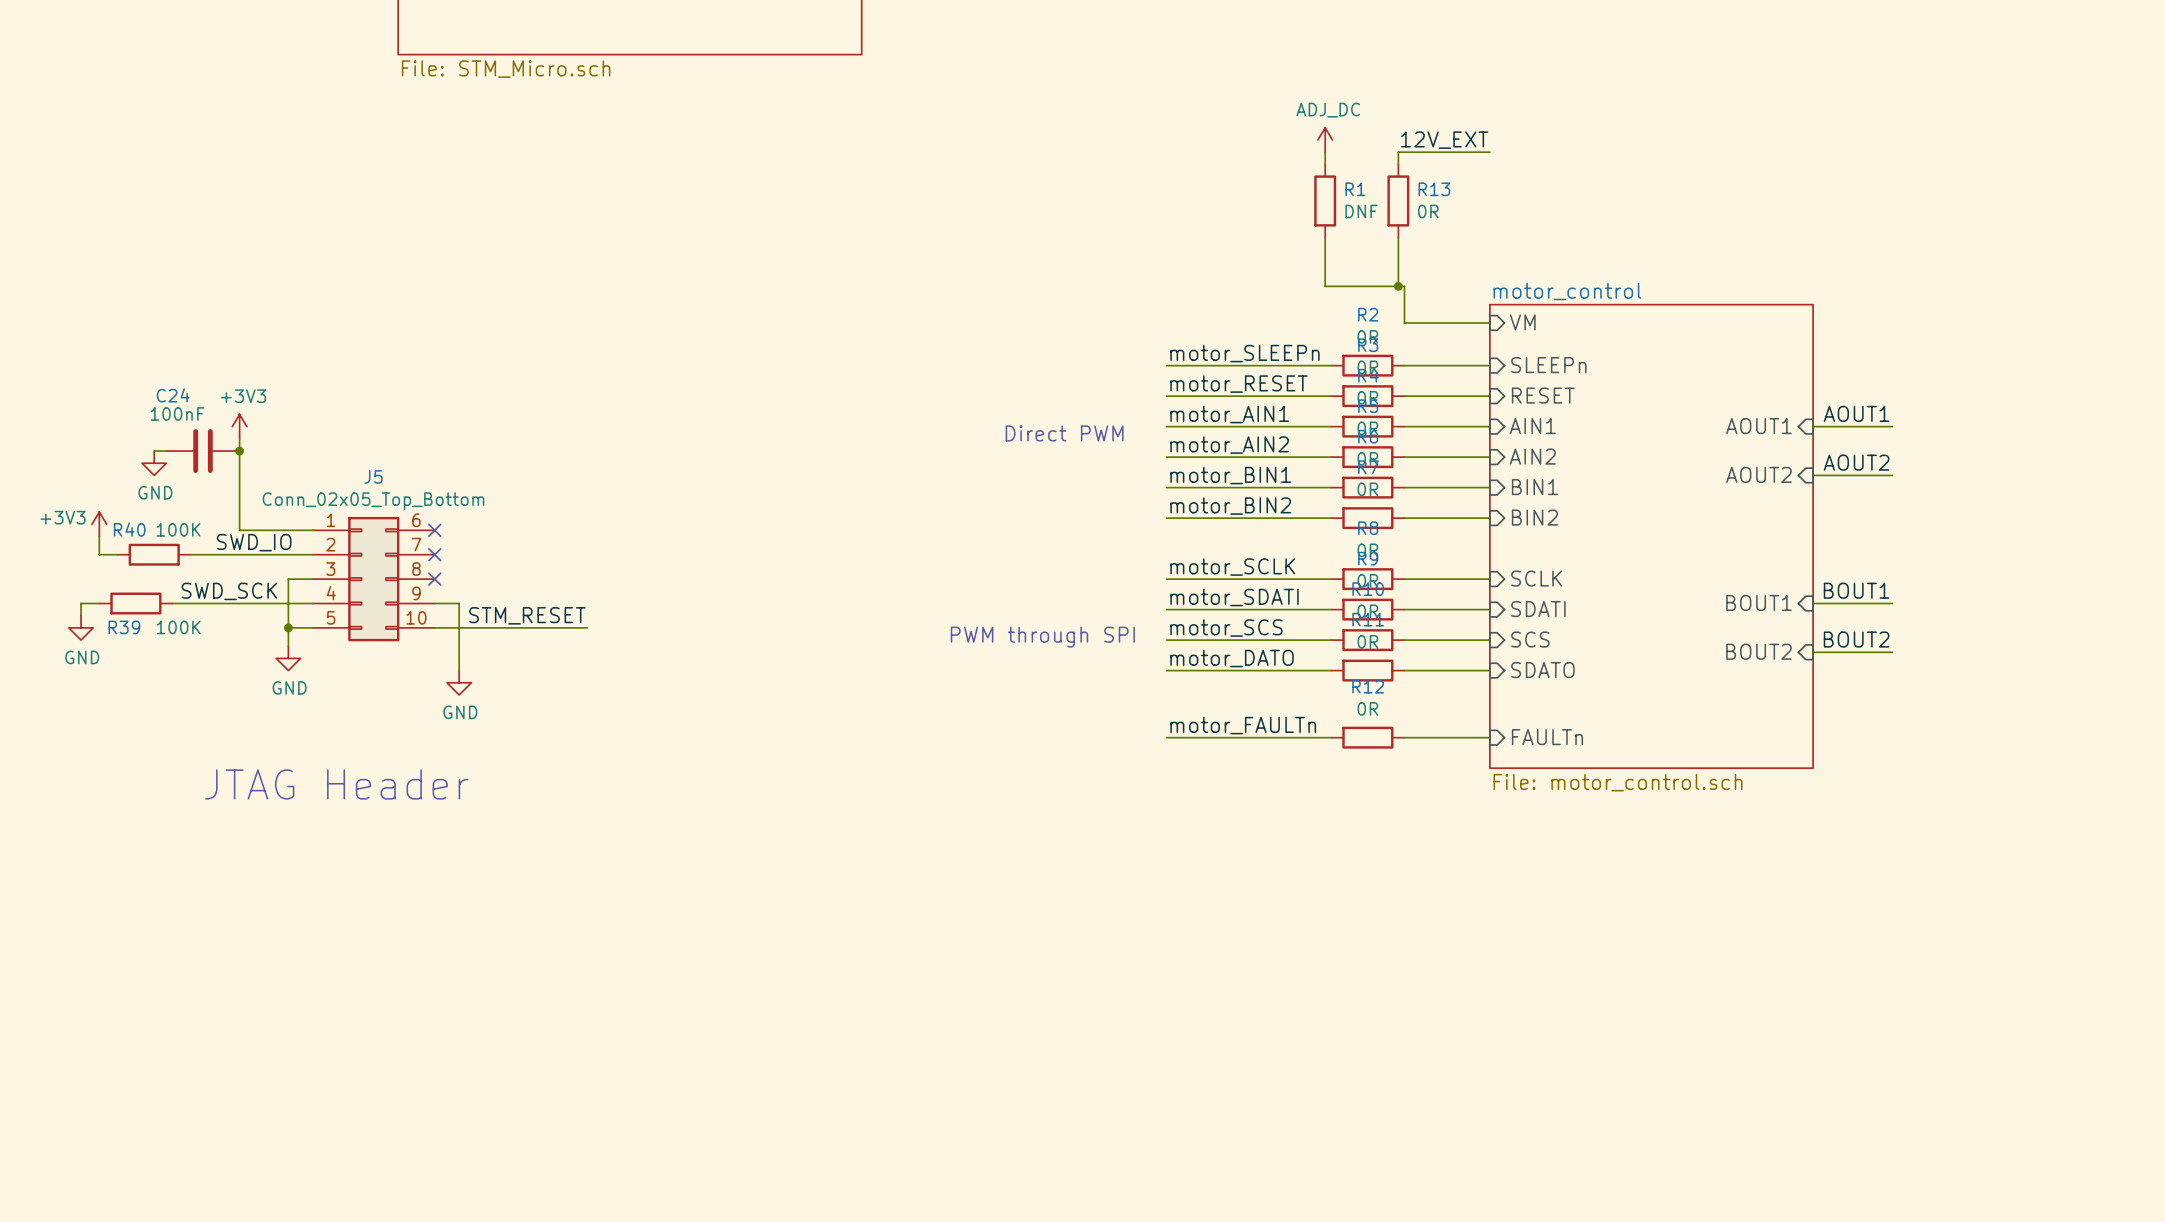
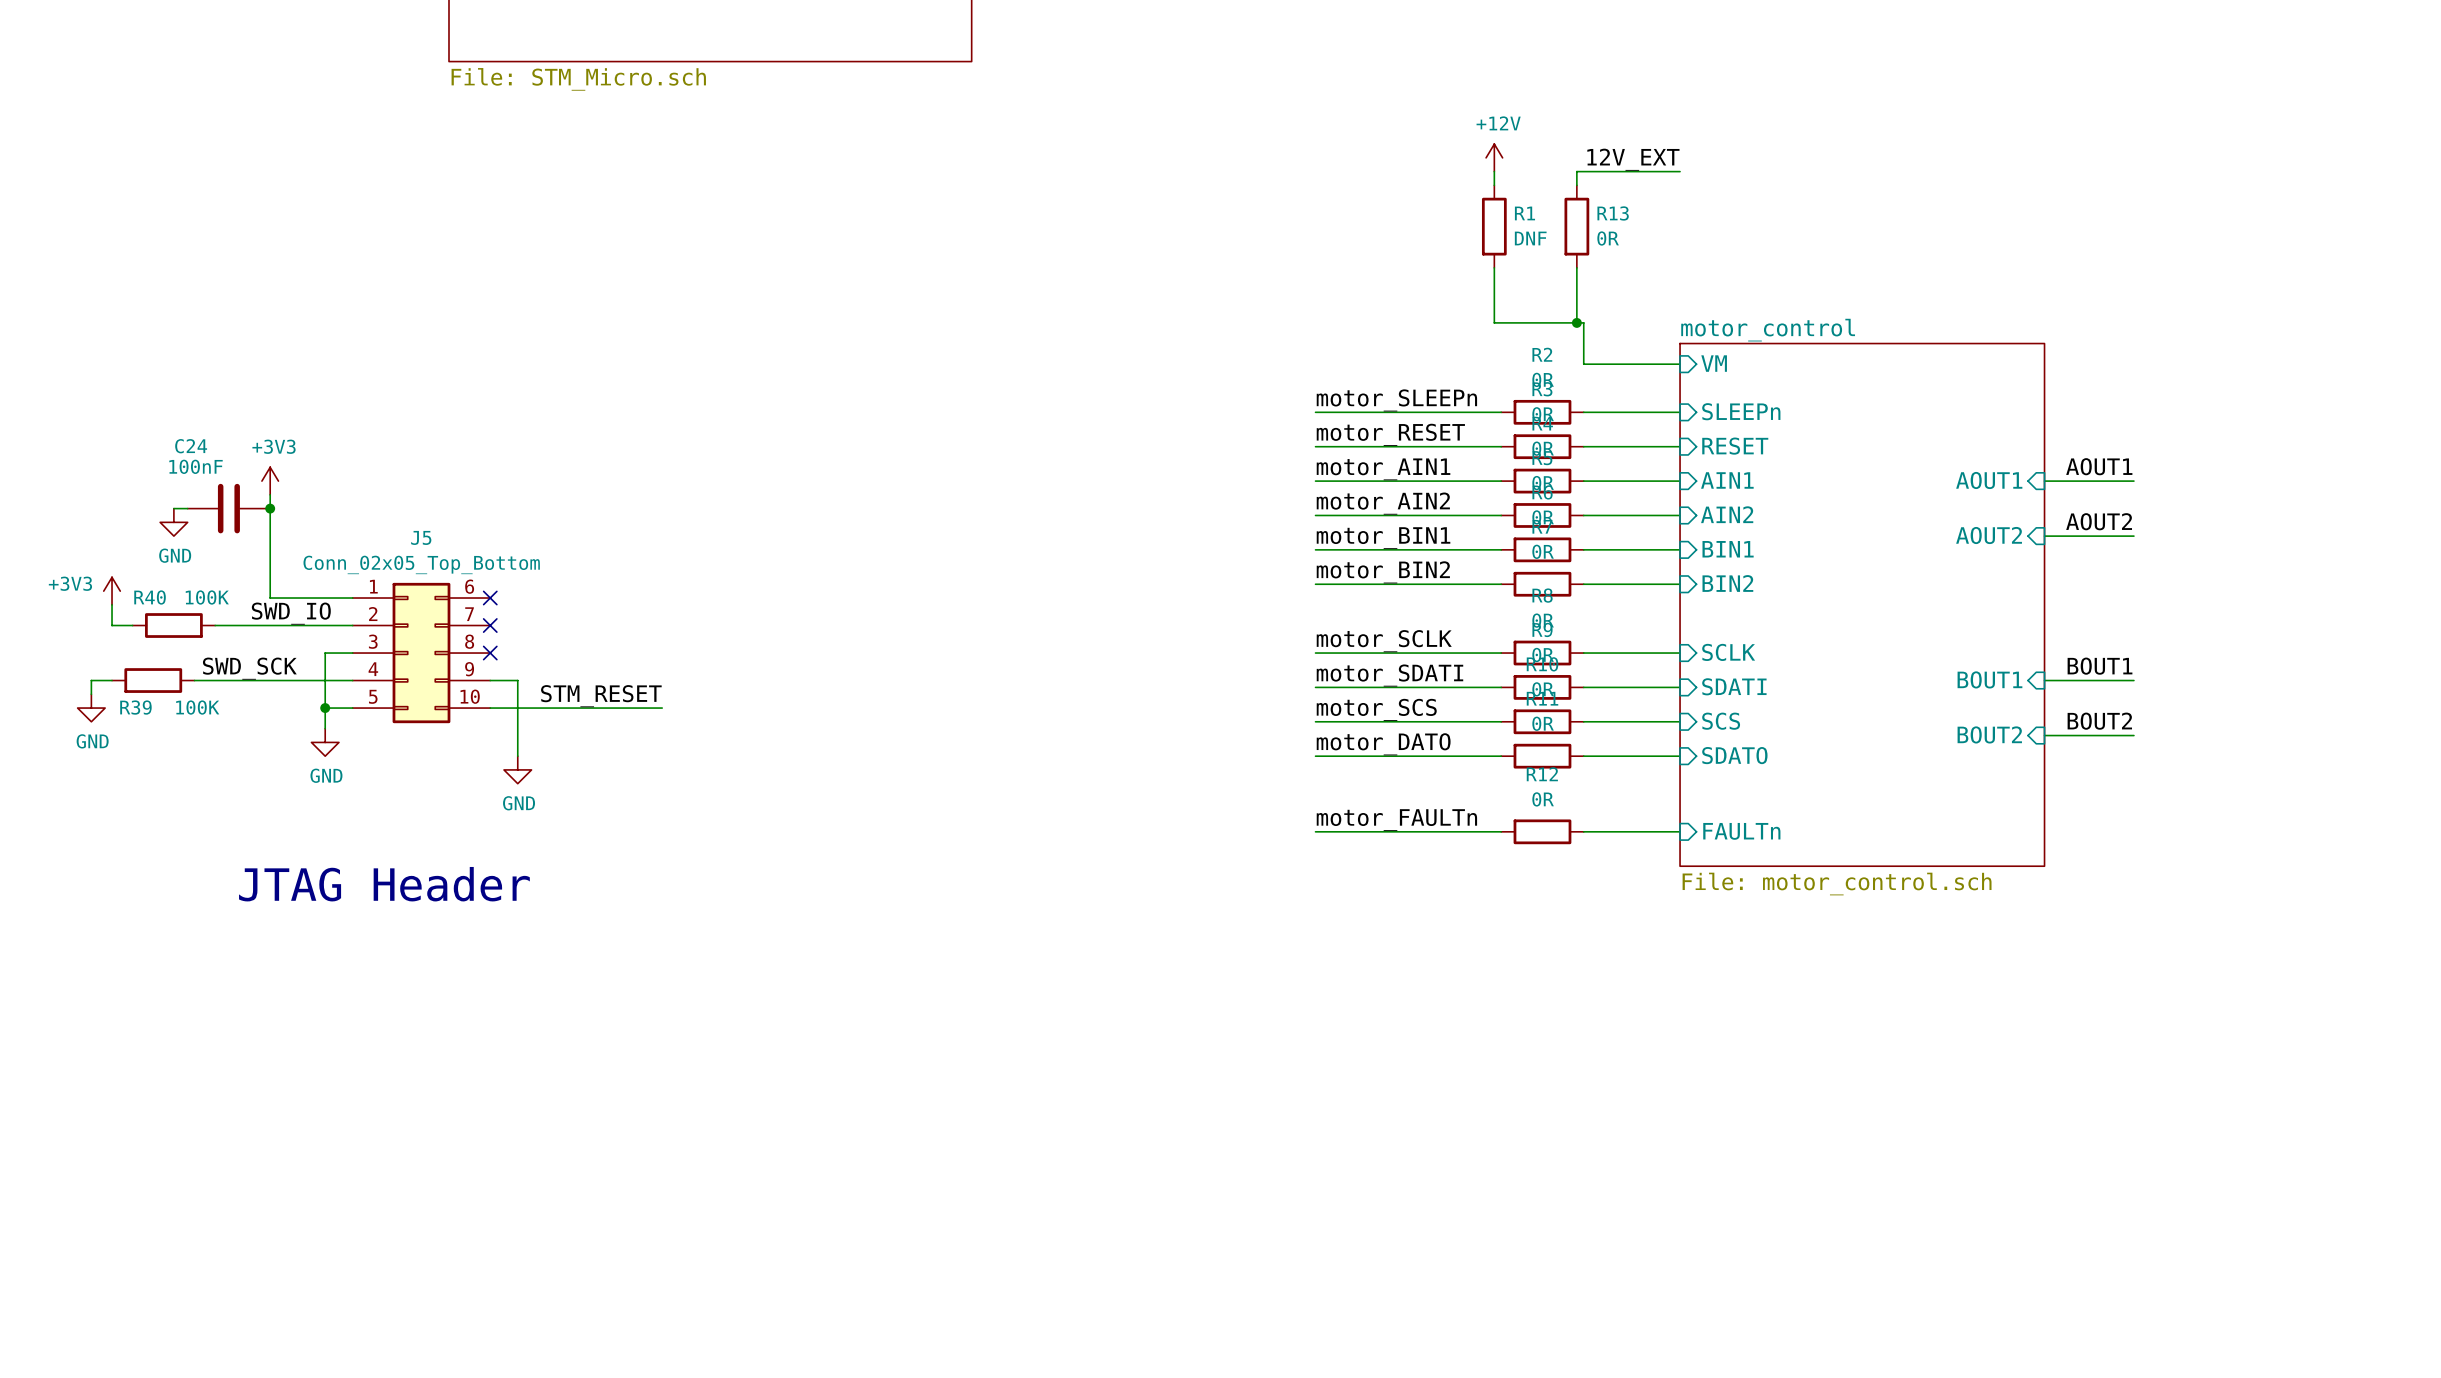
power symbol: ADJ_DC (1325, 139) -> +12V (1494, 157)
text: Direct PWM (1064, 433) -> none
text: PWM through SPI (1042, 637) -> none

